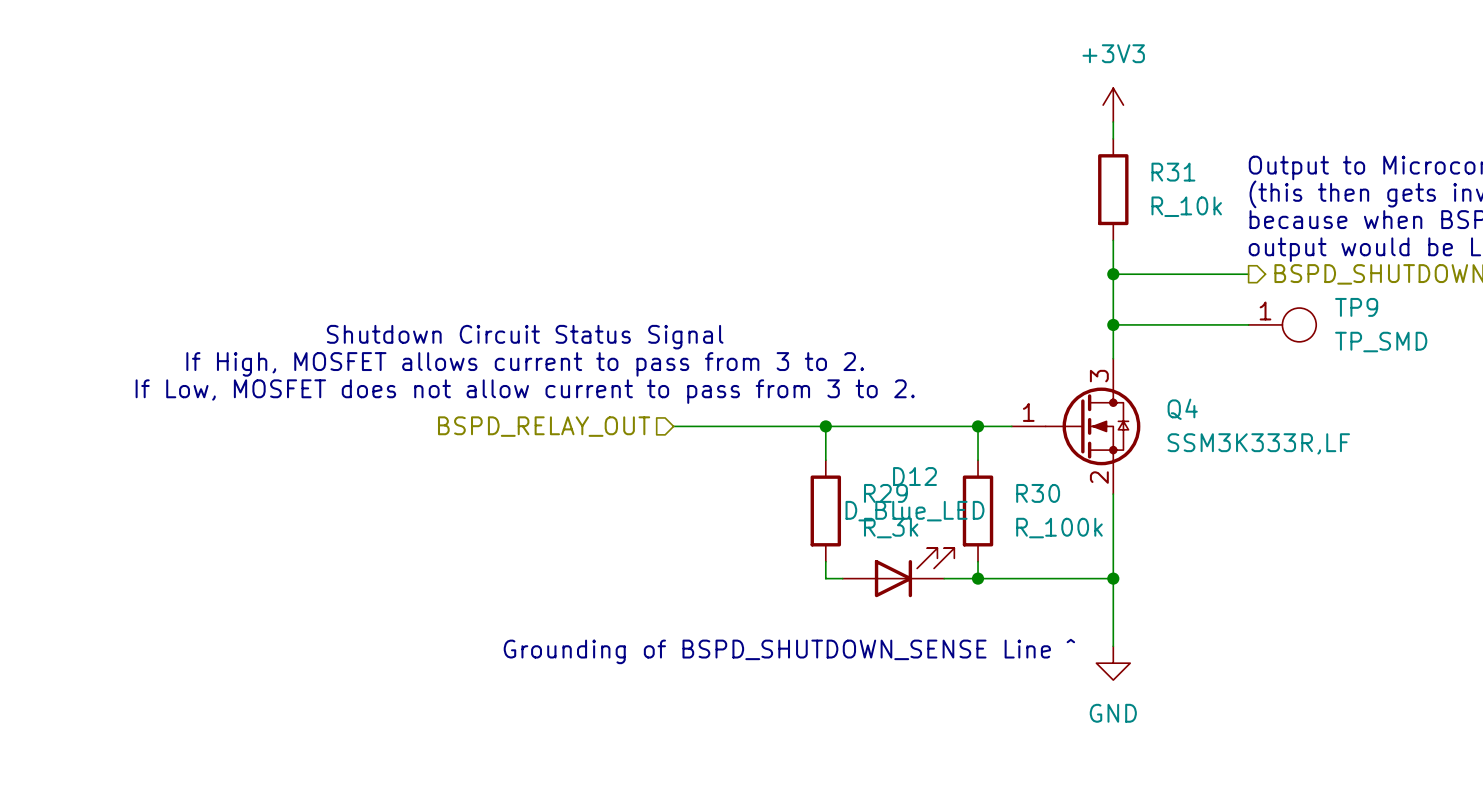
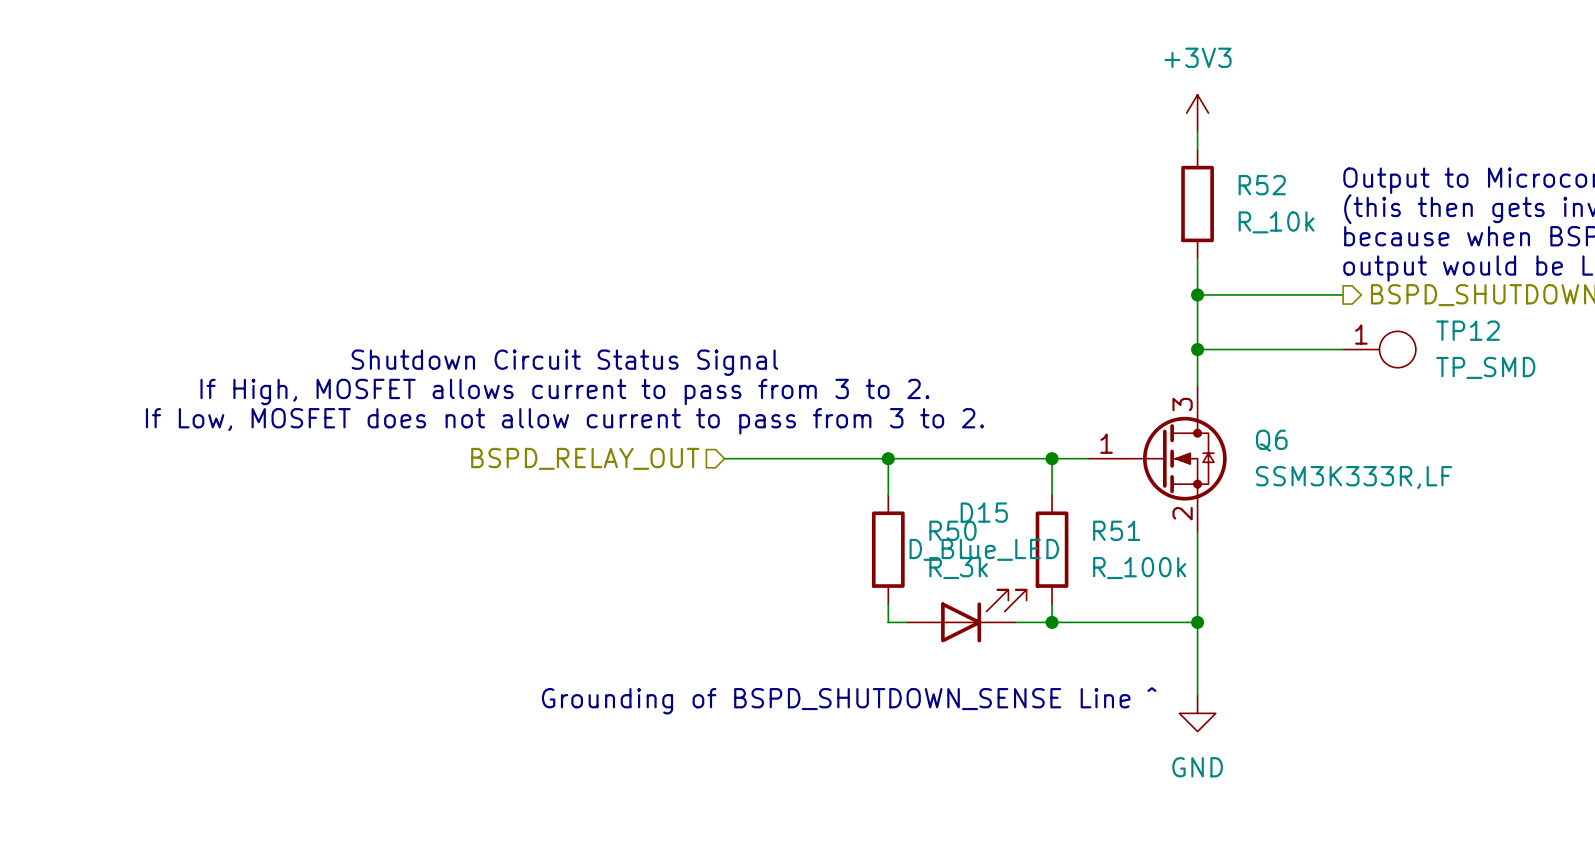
R31 name: R31 (1173, 172) -> R52 (1262, 185)
TP9 name: TP9 (1356, 307) -> TP12 (1467, 330)
Q4 name: Q4 (1182, 409) -> Q6 (1271, 440)
D12 name: D12 (914, 476) -> D15 (984, 512)
R29 name: R29 (885, 493) -> R50 (952, 530)
R30 name: R30 (1038, 493) -> R51 (1116, 530)

